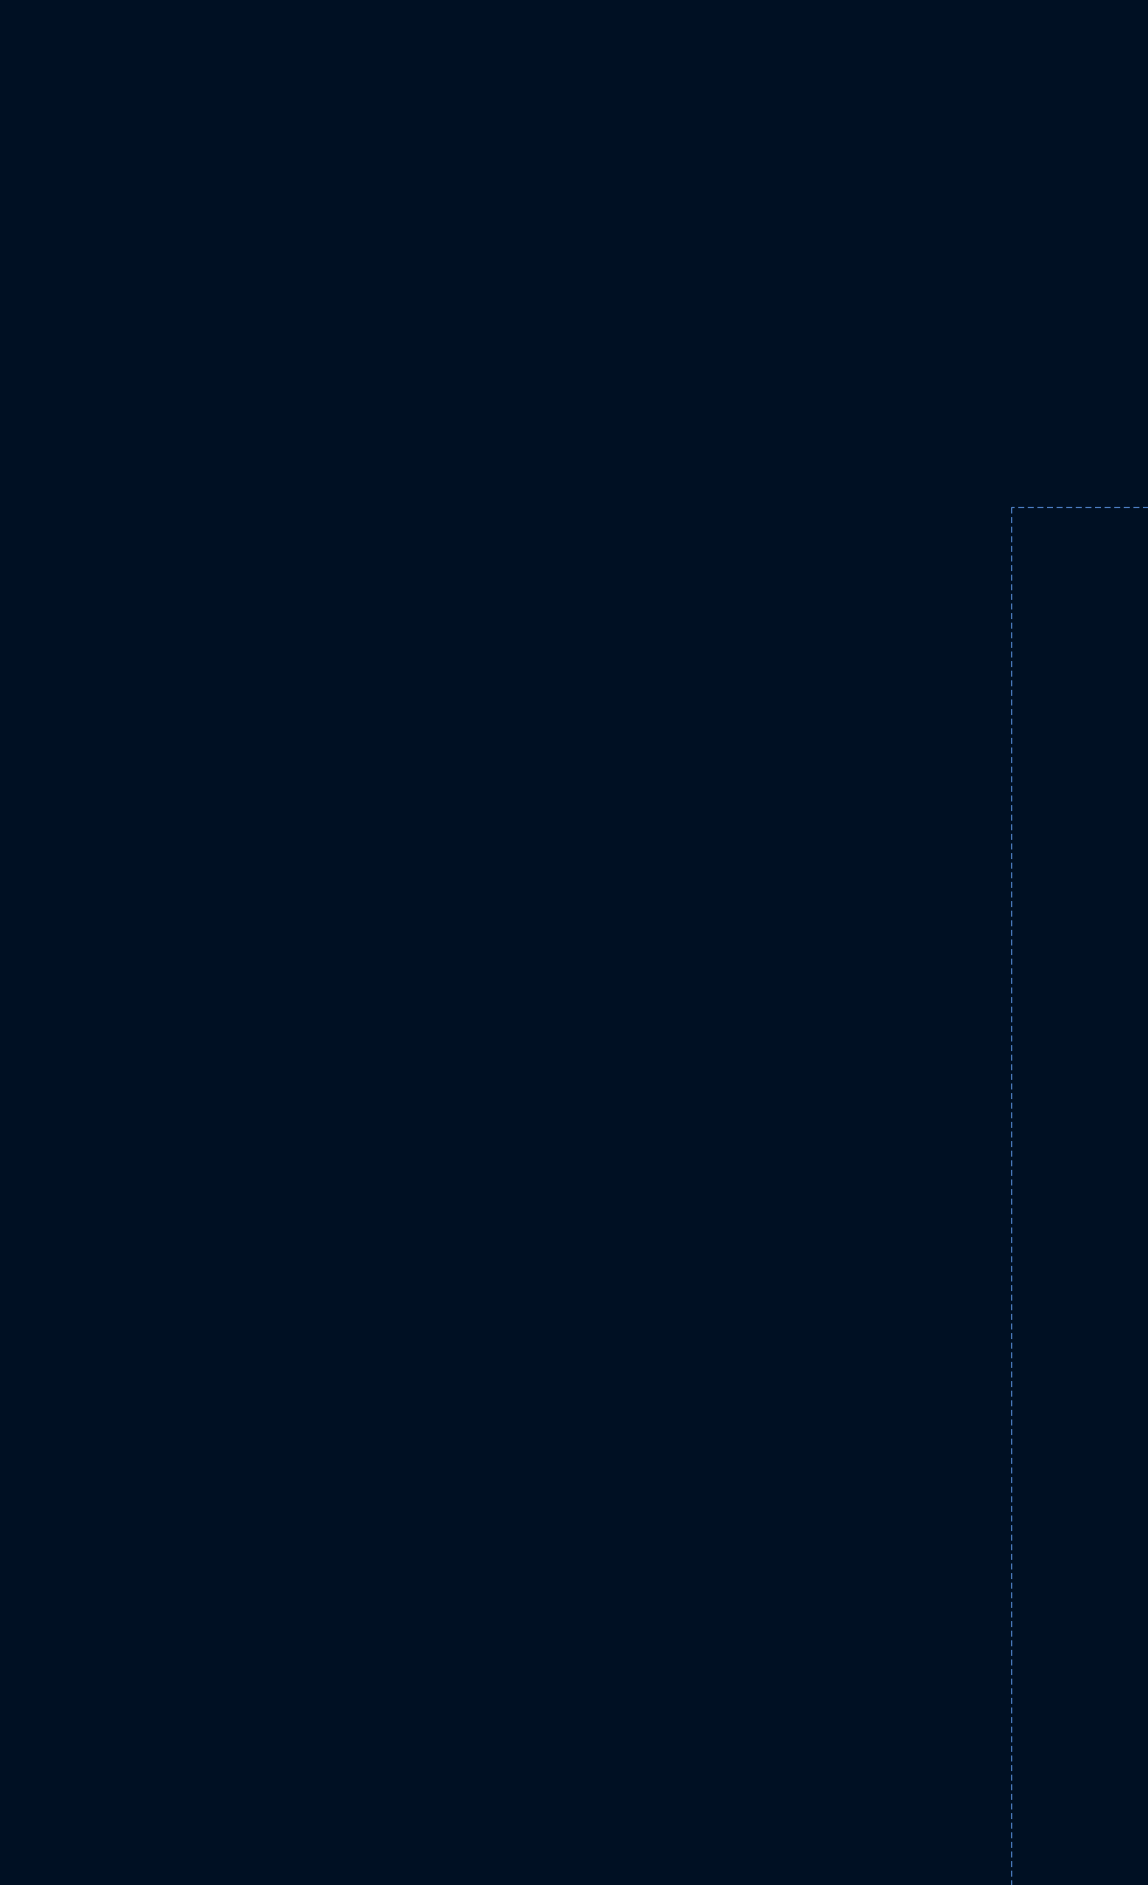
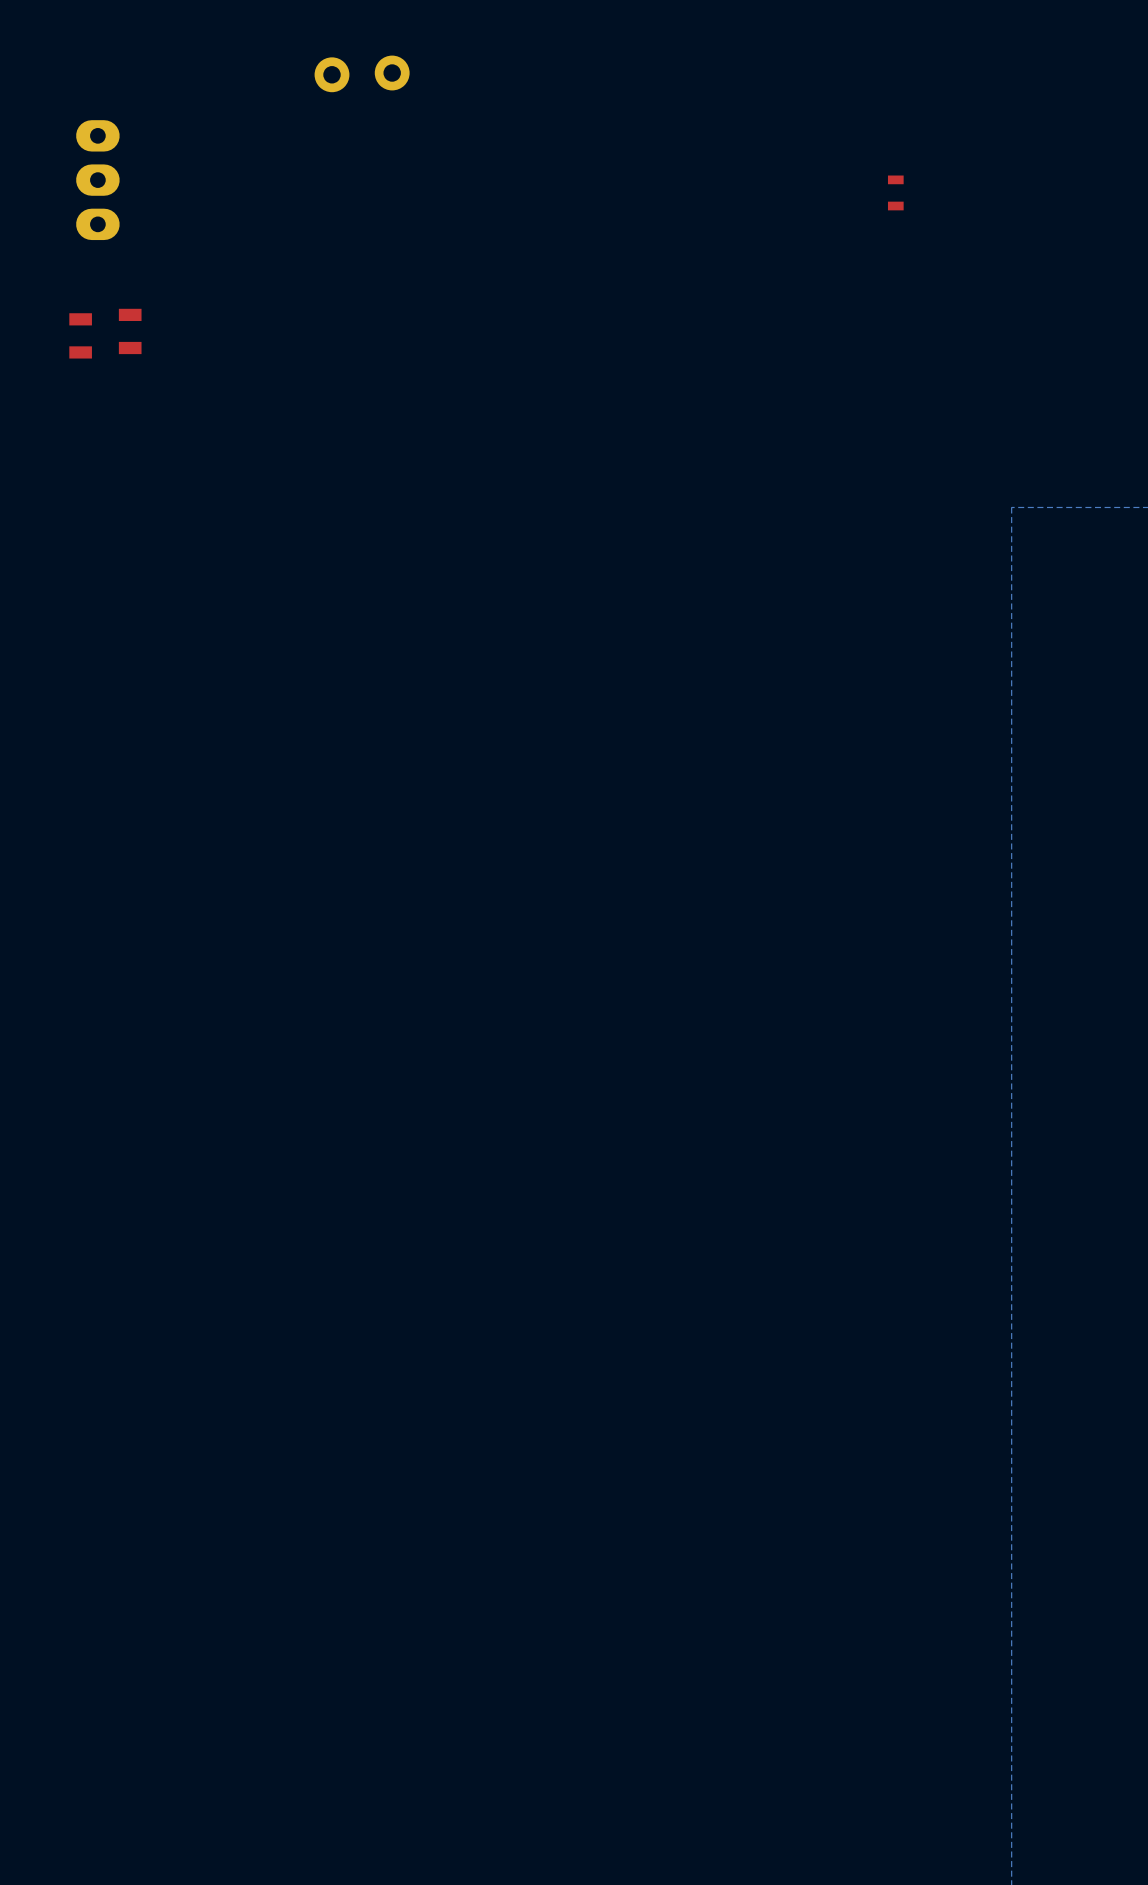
part: none -> (392, 73)
part: none -> (332, 74)
part: none -> (97, 180)
part: none -> (895, 192)
part: none -> (130, 331)
part: none -> (80, 335)

